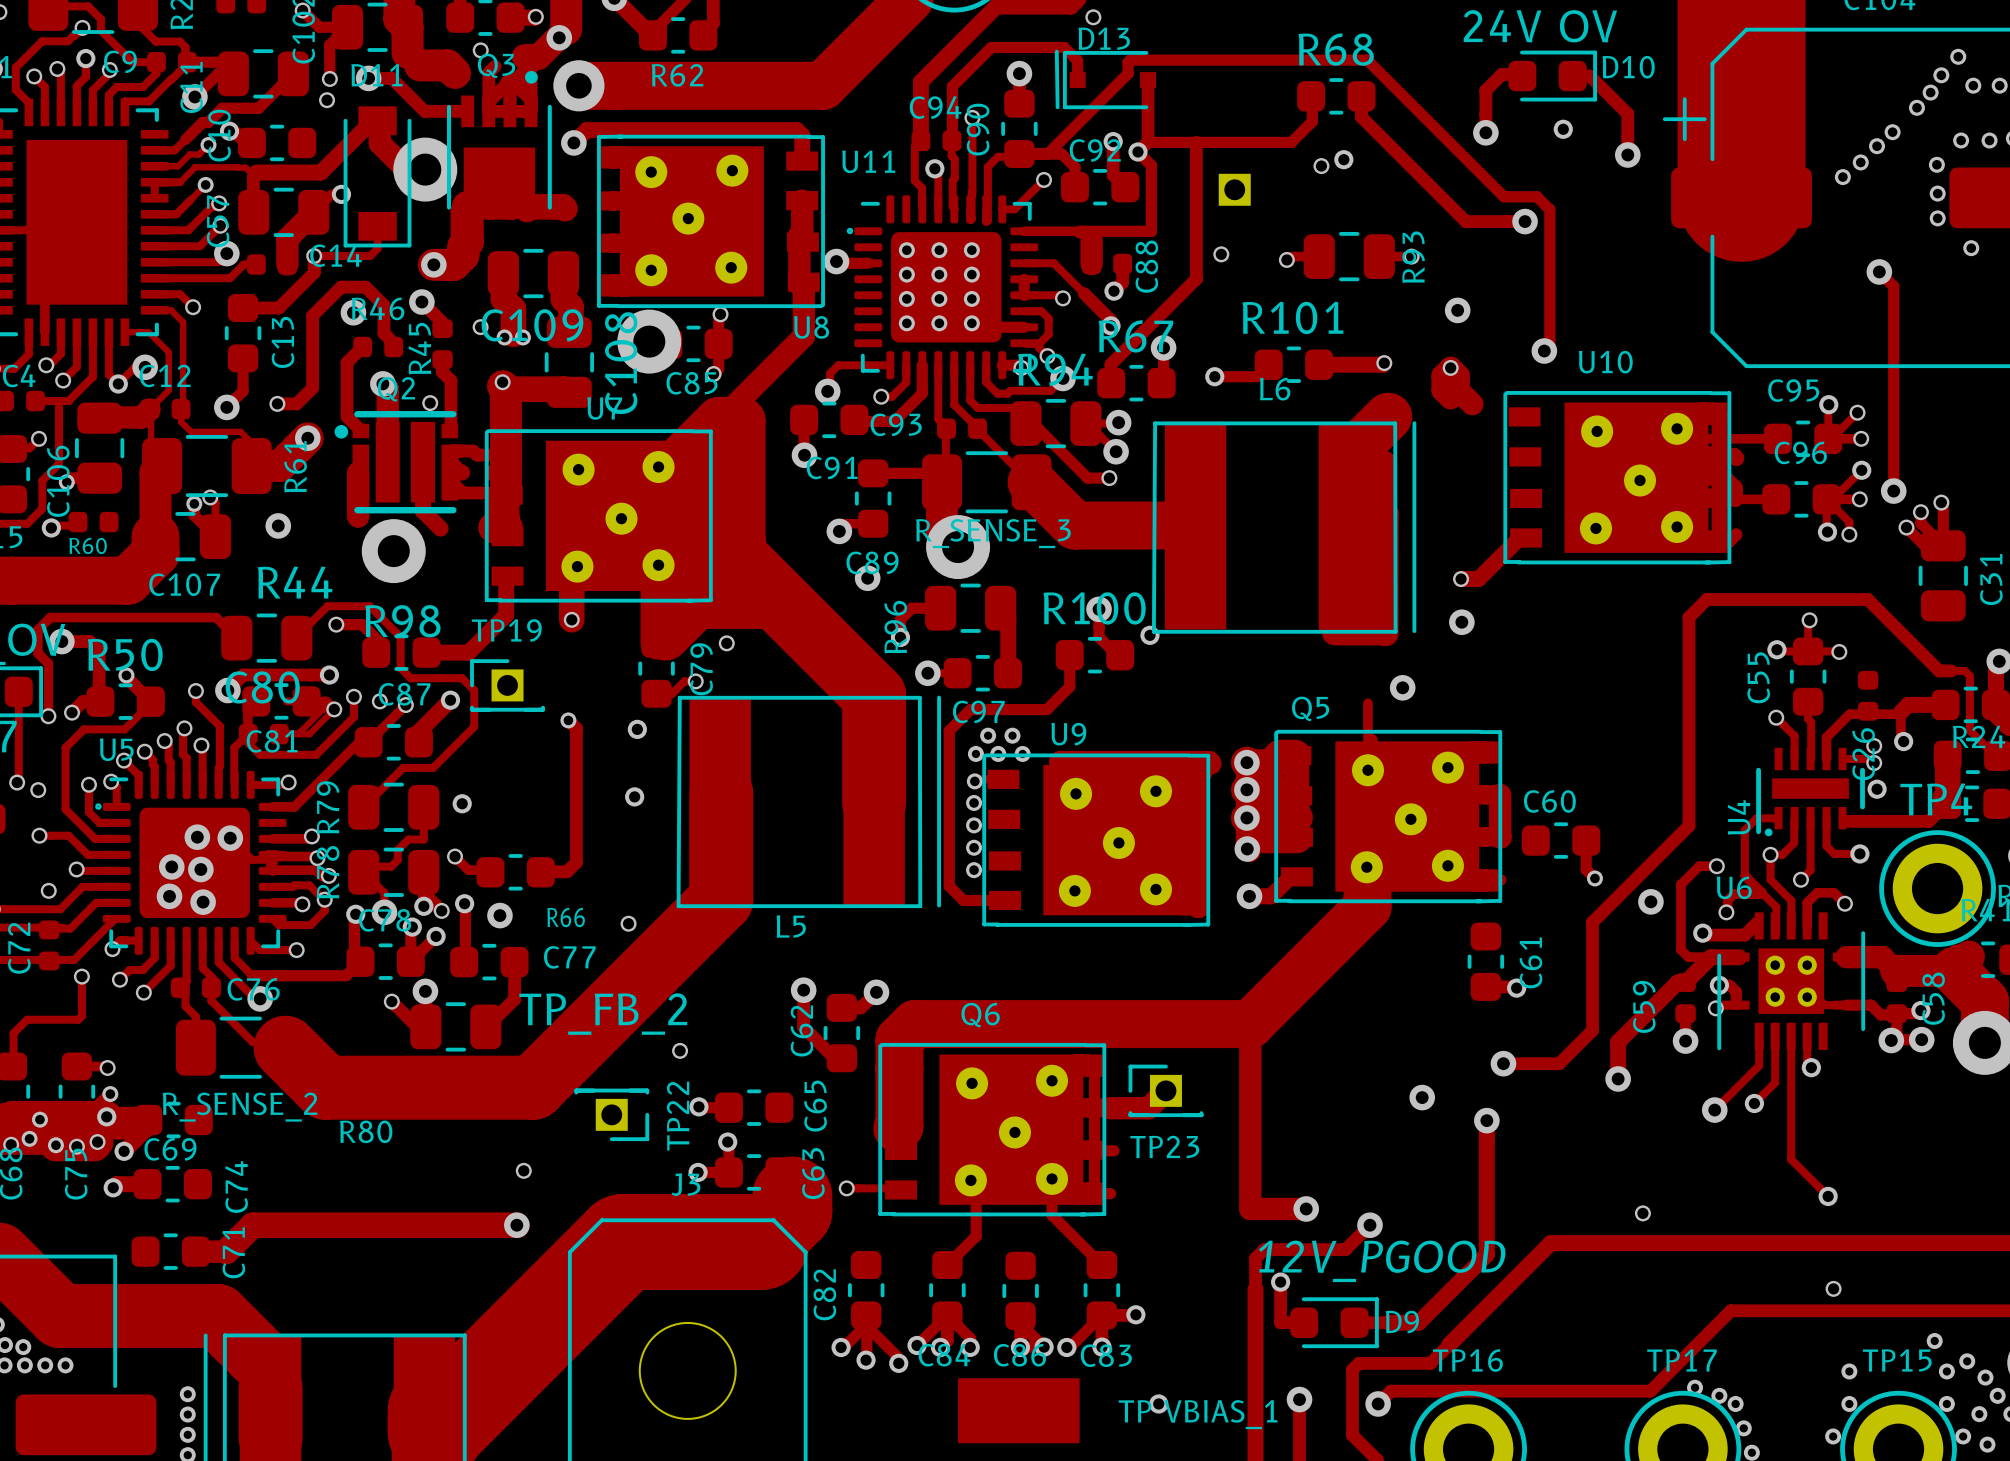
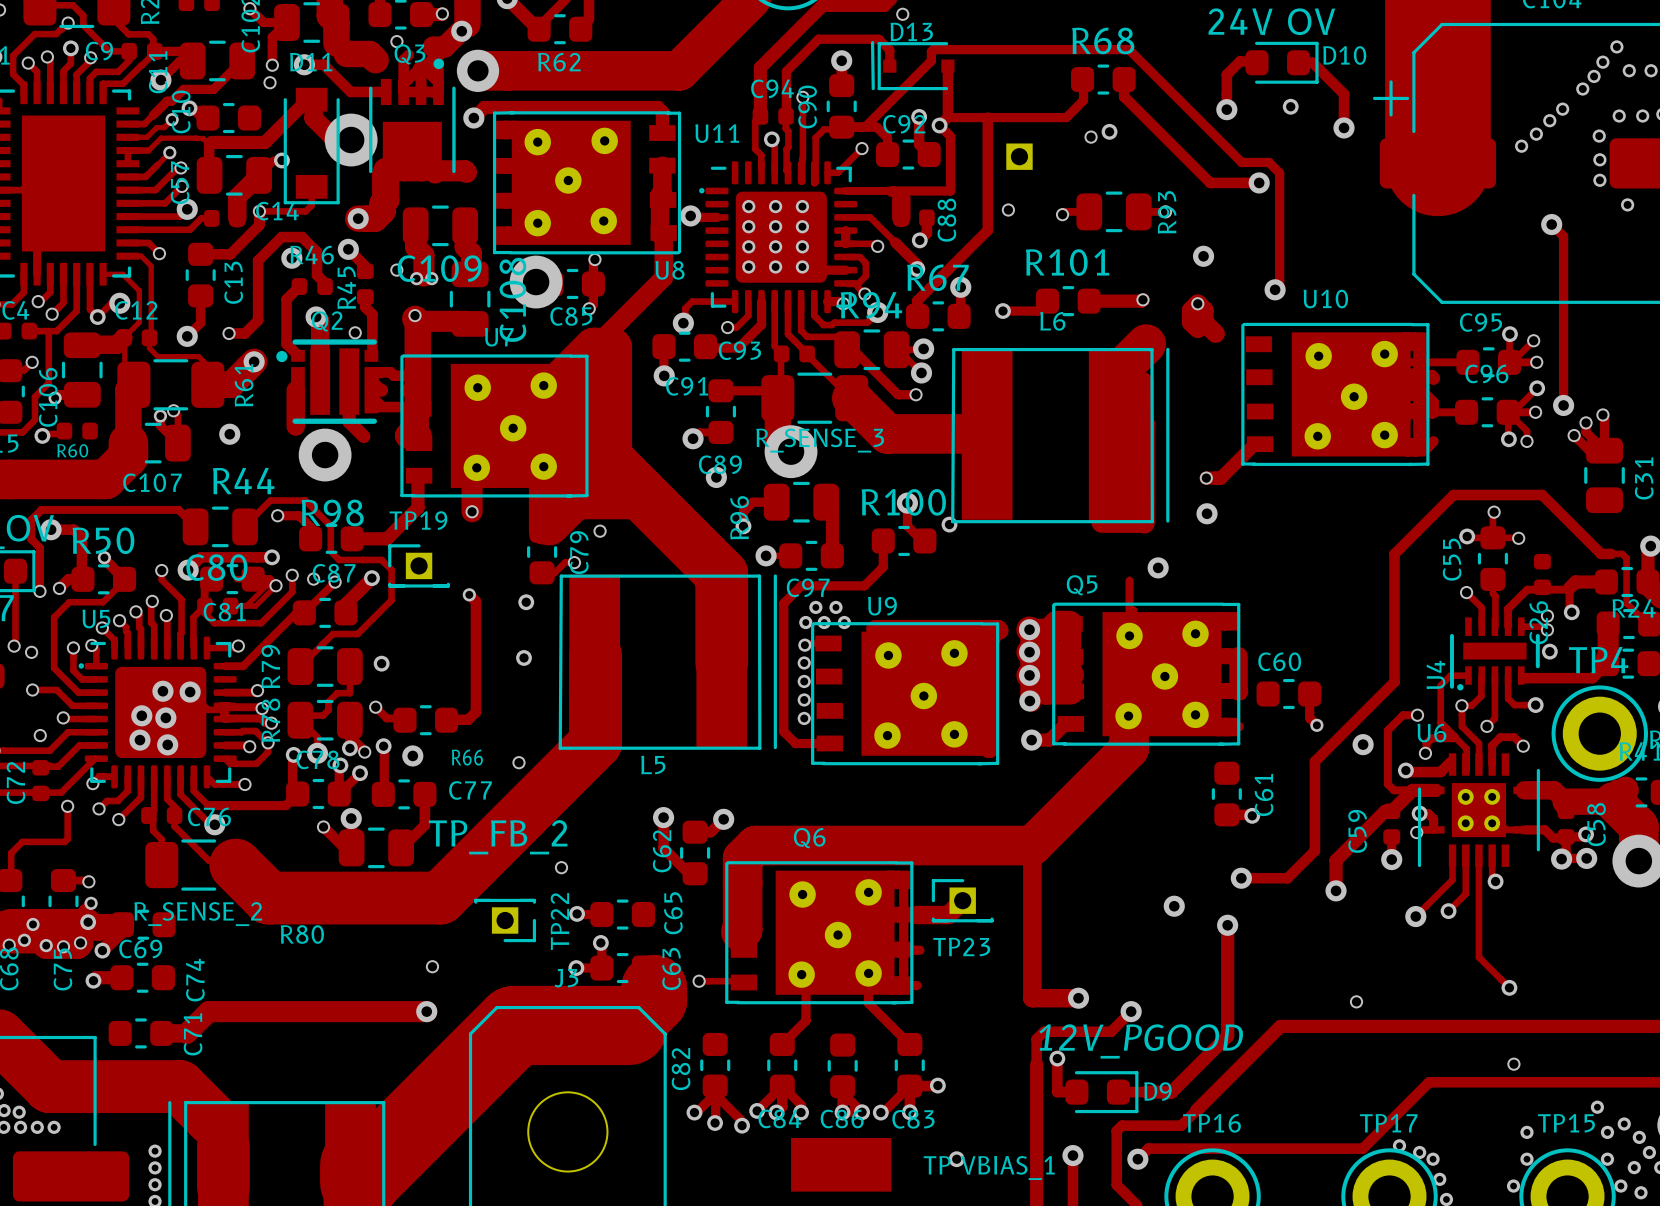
track: (1760, 599) (1706, 599) (1688, 617) (1688, 671) -> (1453, 495) (1394, 554)

